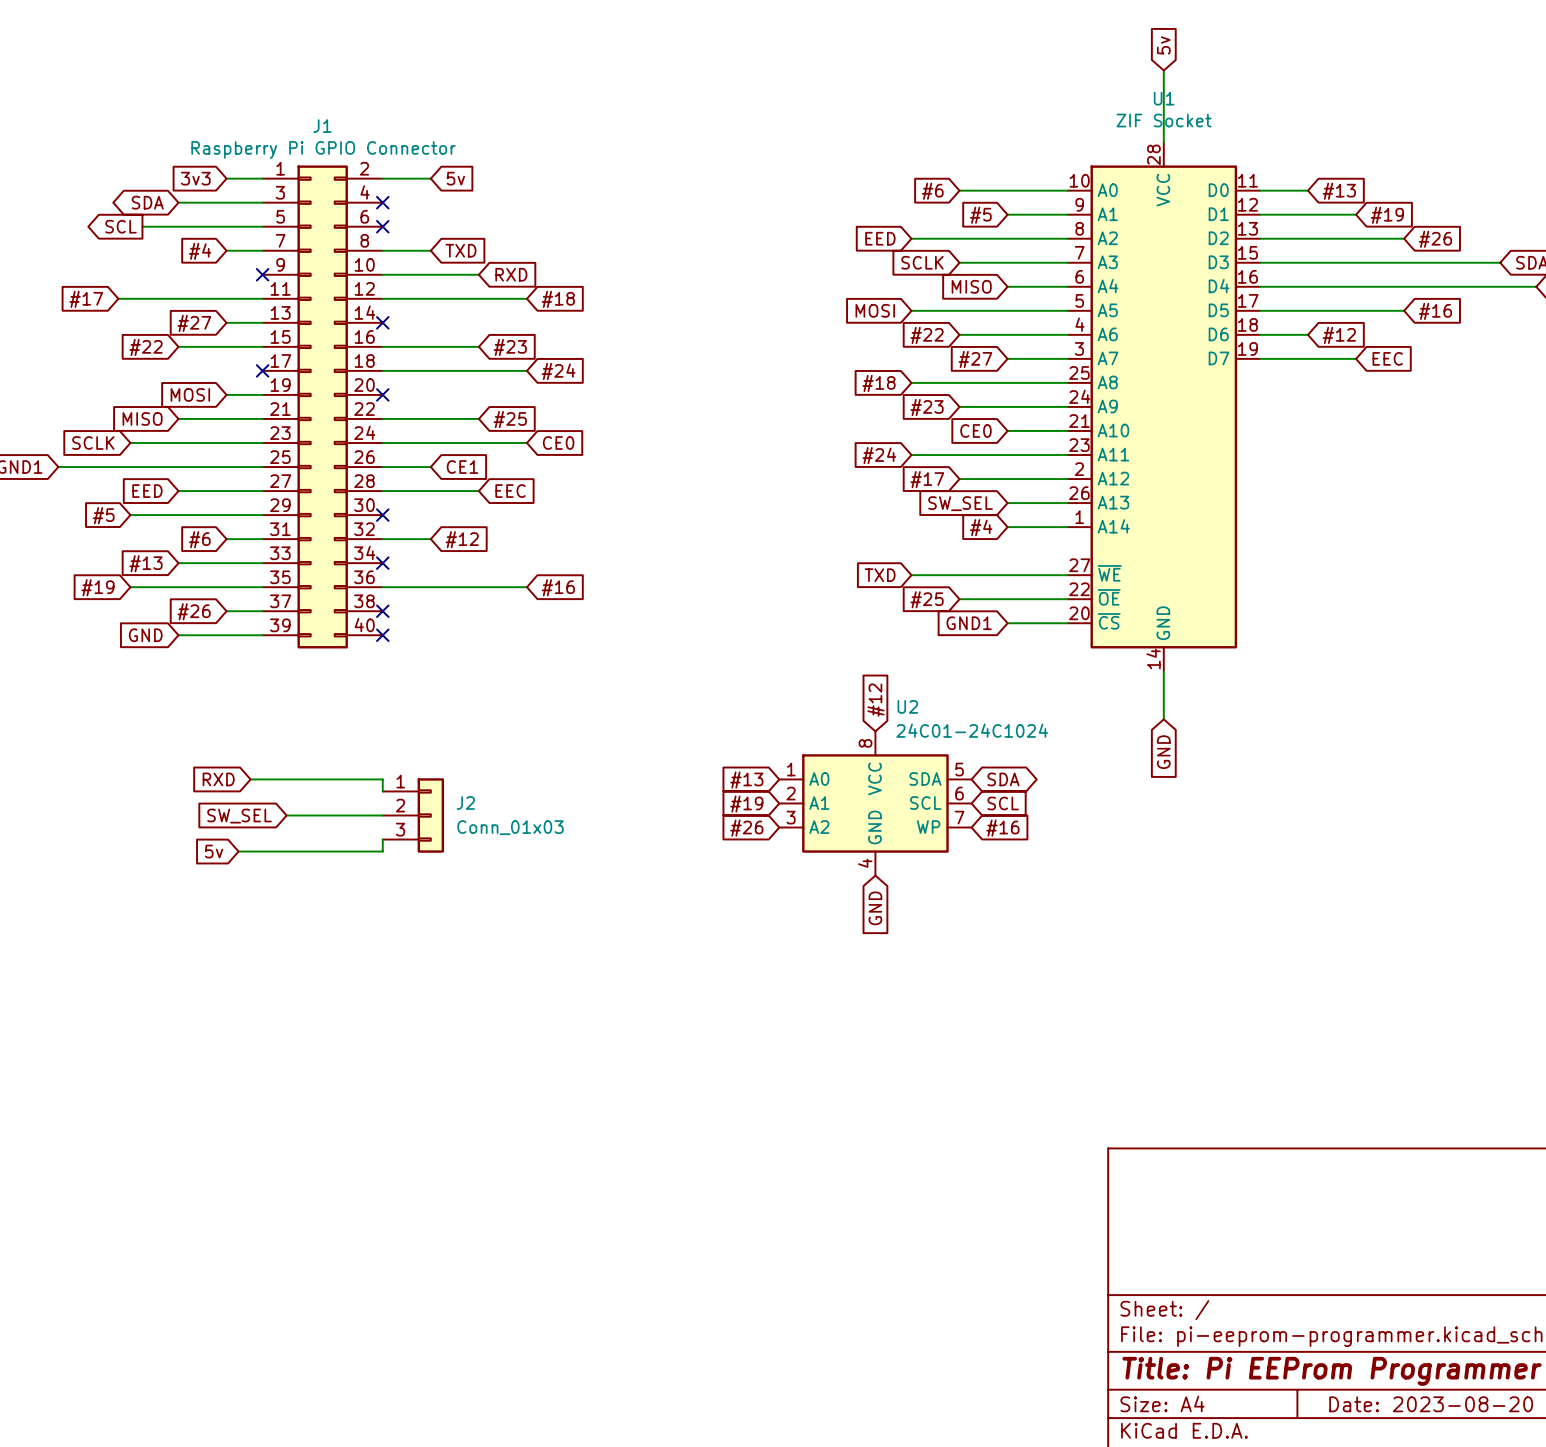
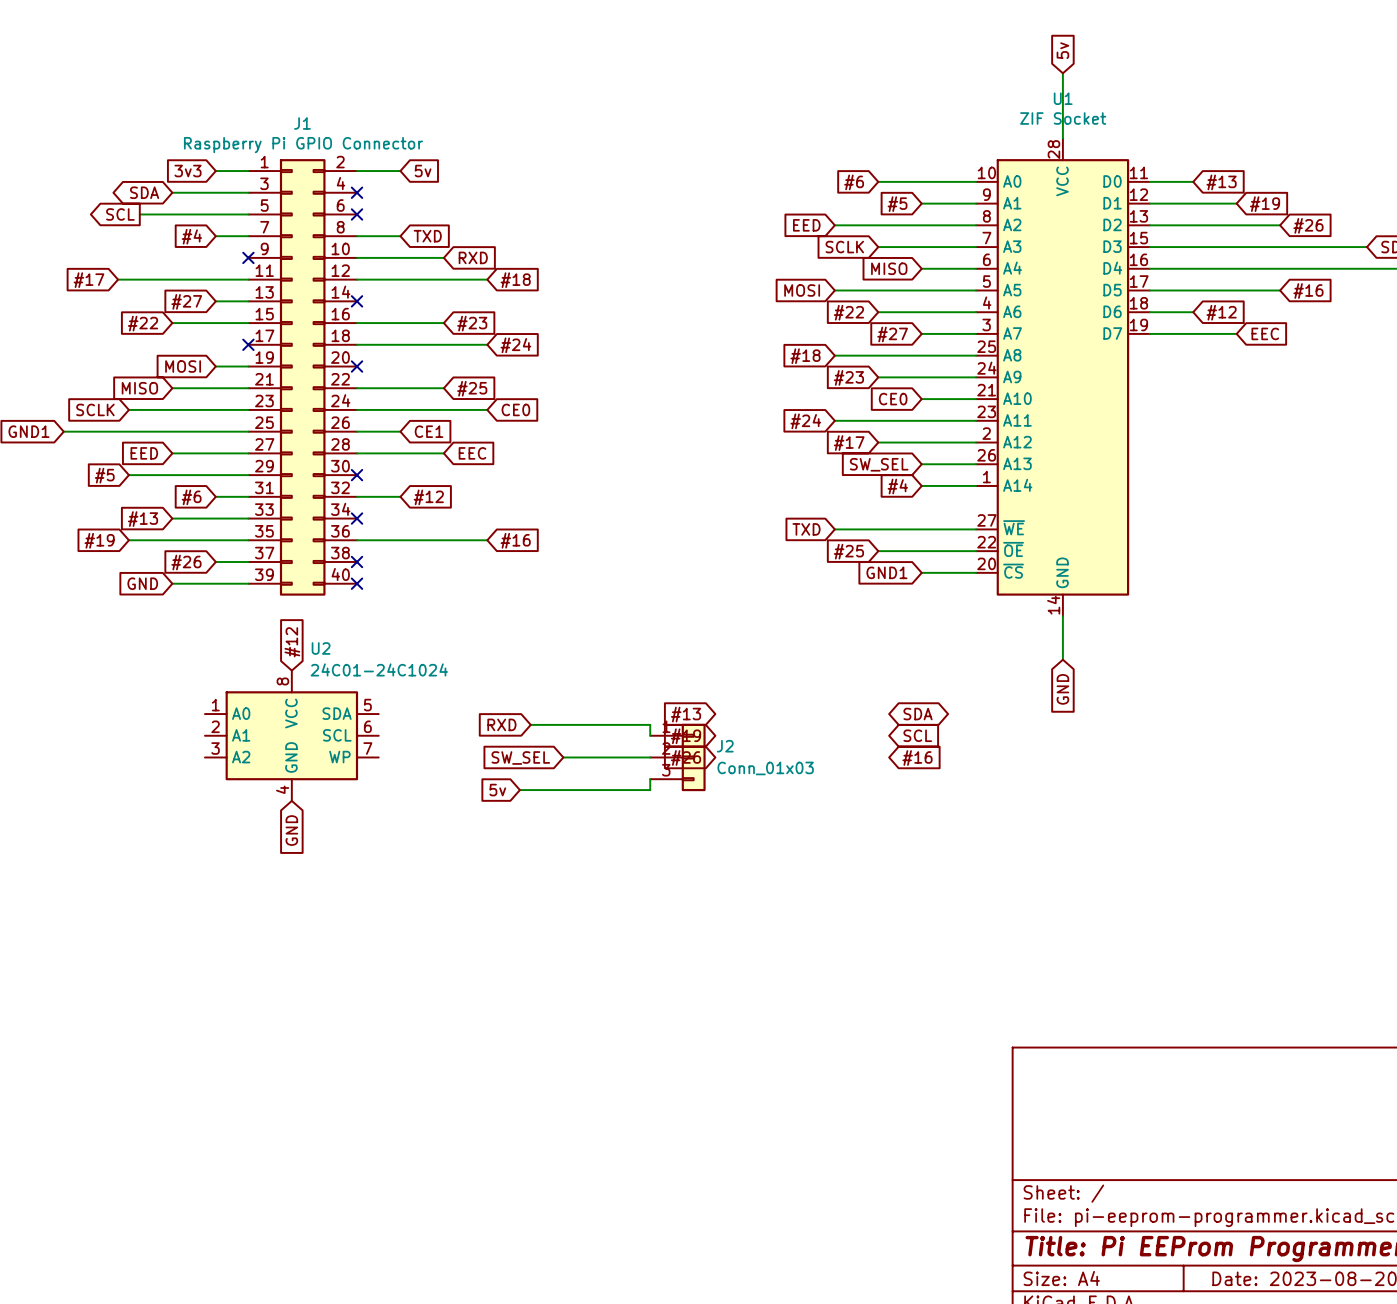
global label: none -> #12 (292, 642)
global label: #12 (876, 700) -> none
global label: RXD (218, 779) -> none
global label: none -> RXD (501, 724)
wire: none -> (530, 724) (650, 724) (650, 735)
U2 position: (875, 803) -> (291, 735)
J2 position: (413, 815) -> (677, 757)
global label: SW_SEL (239, 816) -> none
wire: none -> (563, 757) (650, 757)
global label: none -> SW_SEL (520, 758)
global label: 5v (214, 851) -> none
wire: none -> (650, 779) (650, 790) (519, 790)
global label: none -> 5v (497, 790)
global label: none -> GND (291, 830)
global label: GND (875, 908) -> none

